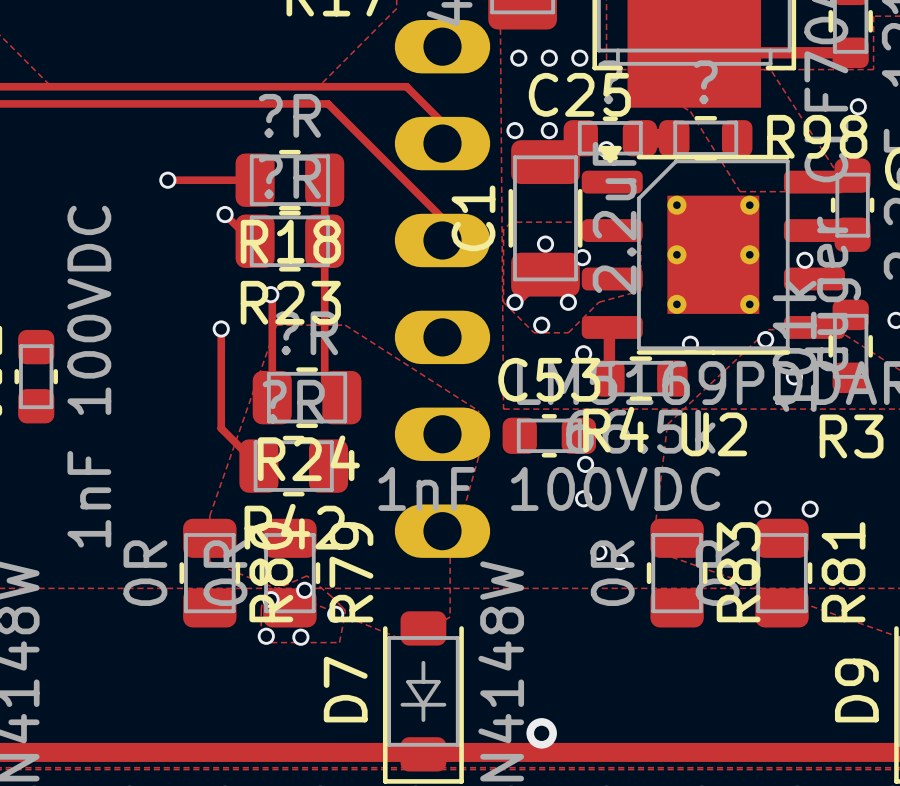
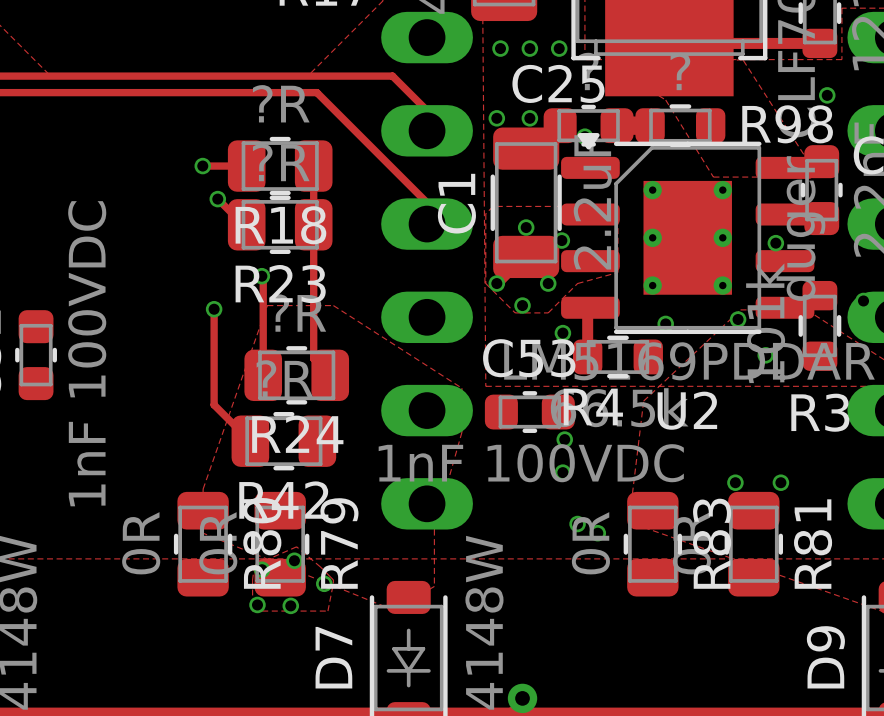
track: (167, 180) (209, 180) -> none
via position: (167, 180) -> (202, 166)

